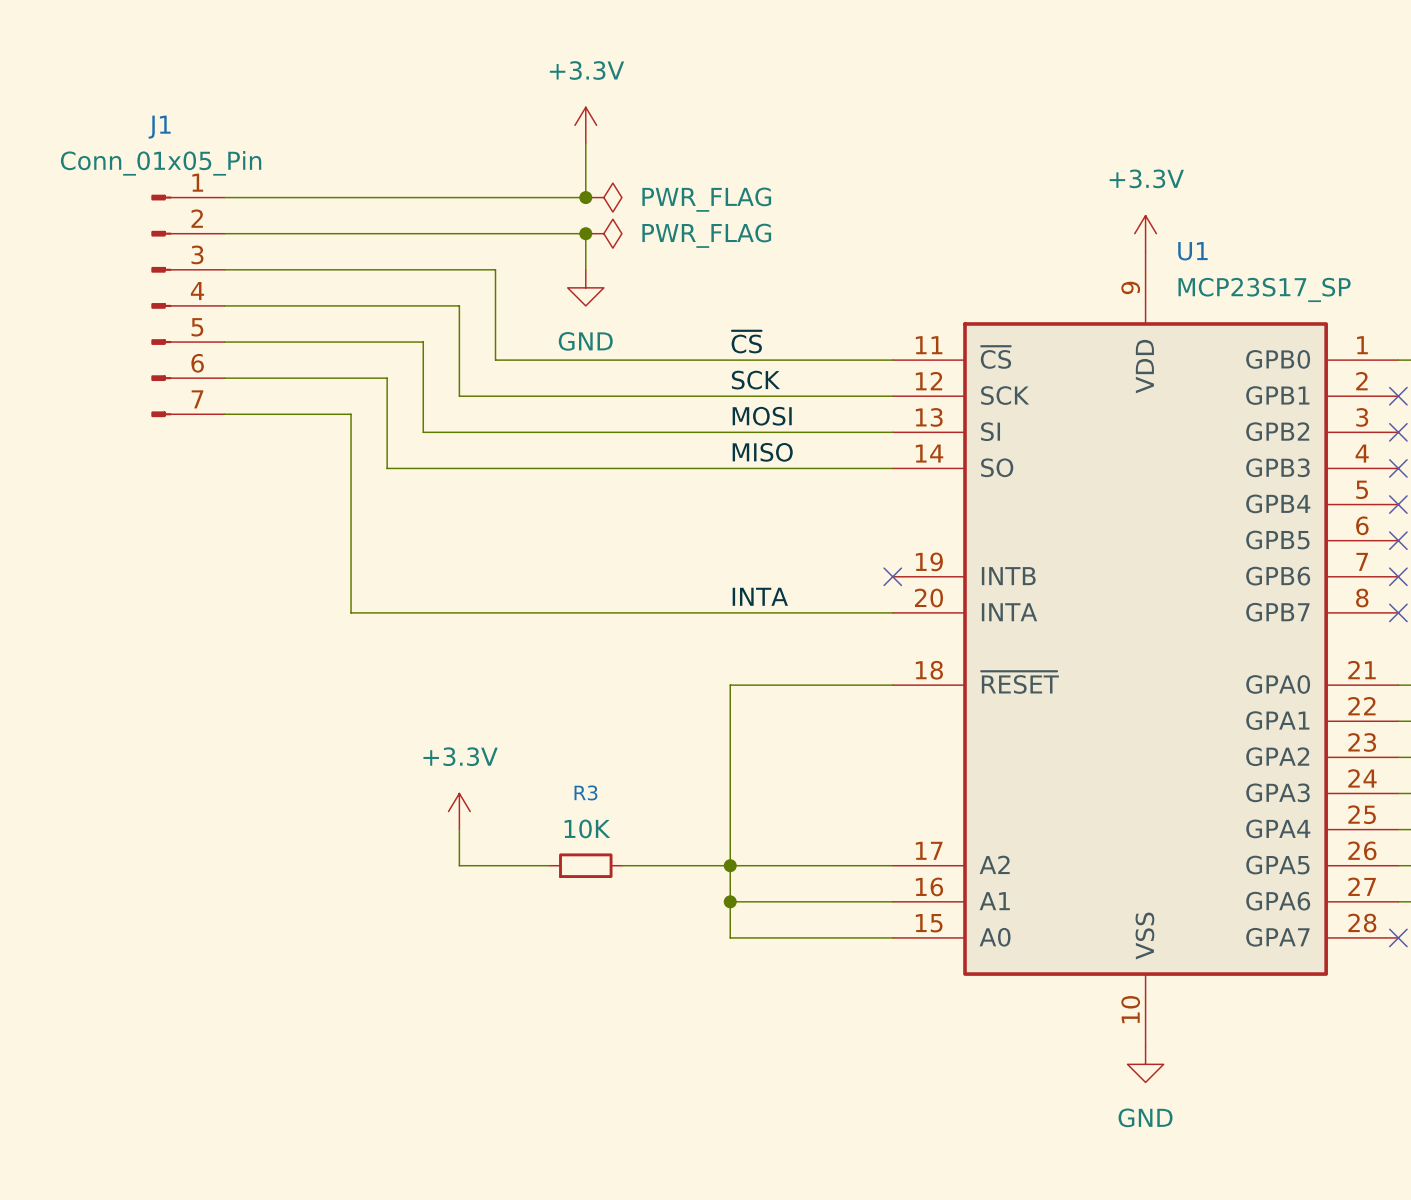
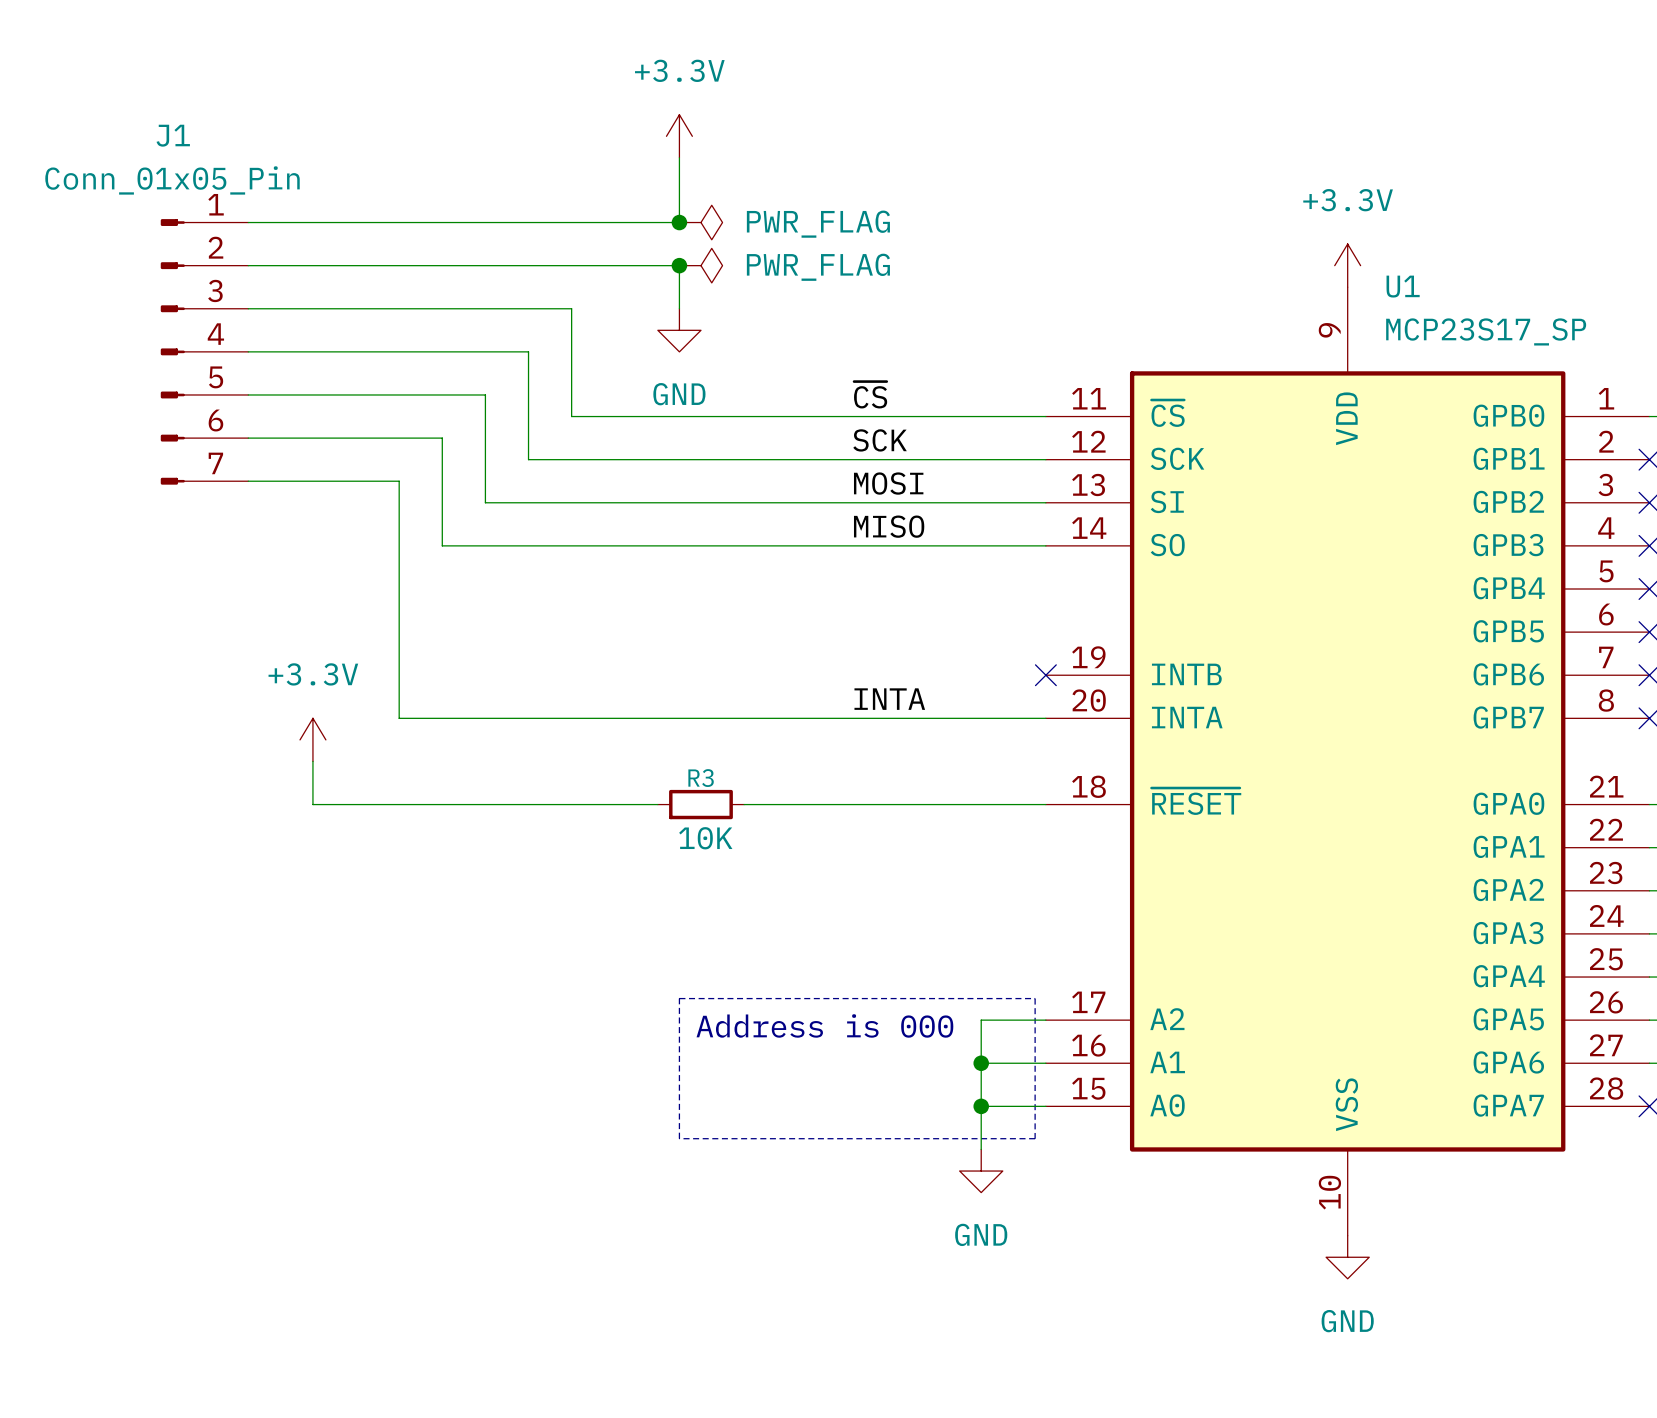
wire: none -> (312, 761) (312, 804) (657, 804)
wire: (730, 685) (730, 937) (838, 937) -> (851, 804) (744, 804)
R3 name position: R3 (585, 792) -> R3 (701, 778)
power symbol position: +3.3V (459, 811) -> +3.3V (312, 739)
R3 value position: 10K (587, 828) -> 10K (705, 838)
wire: (459, 829) (459, 865) (549, 865) -> none
line: none -> (679, 998) (1035, 998) (1035, 1138) (679, 1138) (679, 998)
R3 position: (585, 865) -> (700, 804)
wire: (621, 865) (838, 865) -> (981, 1149) (981, 1020)
junction: (730, 865) -> none
text: none -> Address is 000 (824, 1025)
wire: (730, 901) (838, 901) -> none
junction: (730, 901) -> none
junction: none -> (981, 1063)
junction: none -> (981, 1106)
power symbol: none -> GND (981, 1171)

